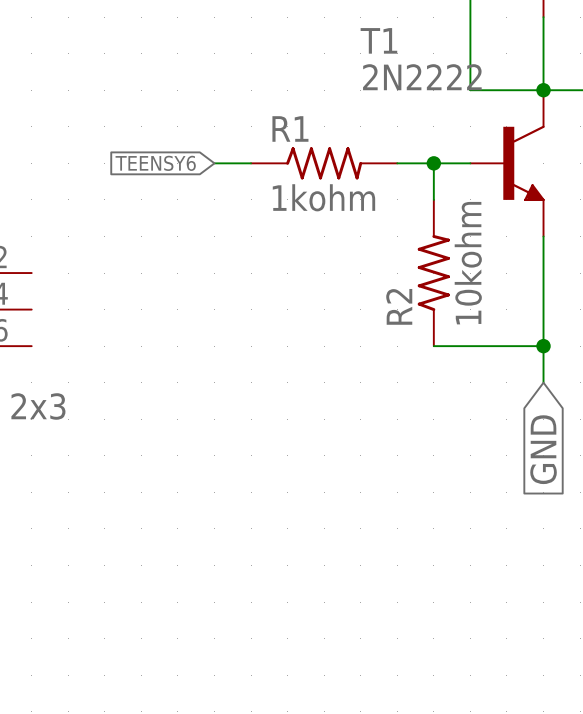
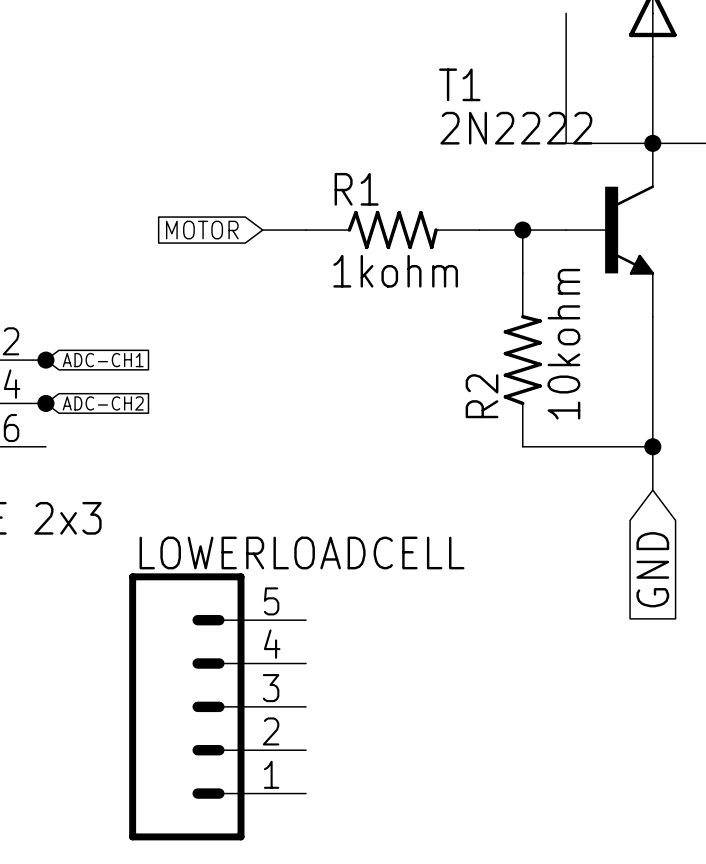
global label: TEENSY6 (155, 163) -> MOTOR (202, 230)
junction: none -> (45, 360)
global label: none -> ADC-CH1 (103, 360)
junction: none -> (45, 403)
global label: none -> ADC-CH2 (103, 403)
LOWERLOADCELL: none -> (217, 706)

